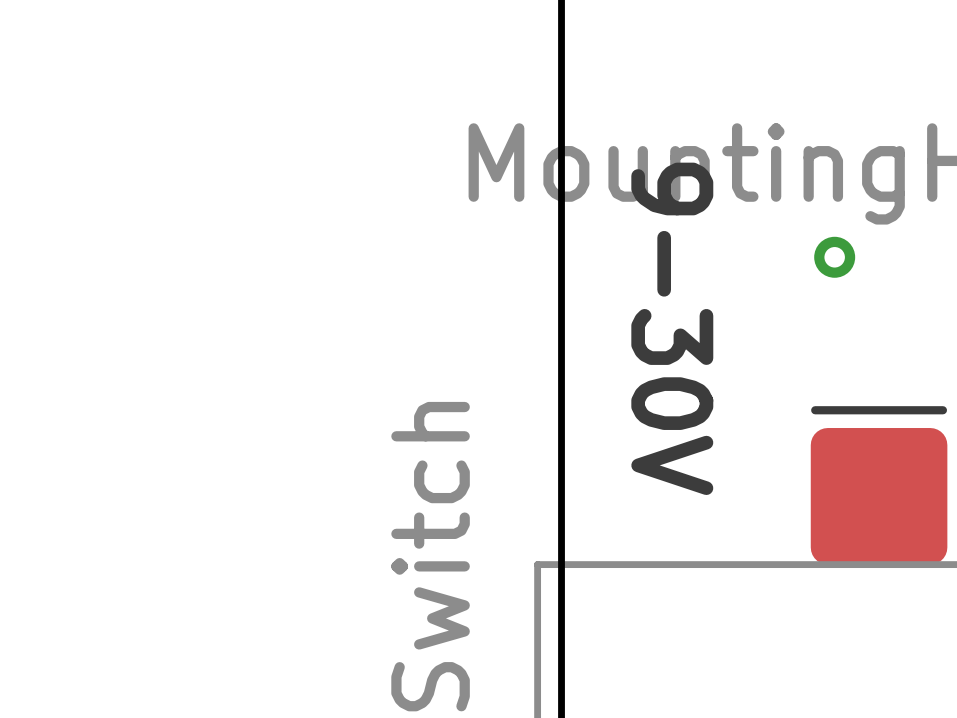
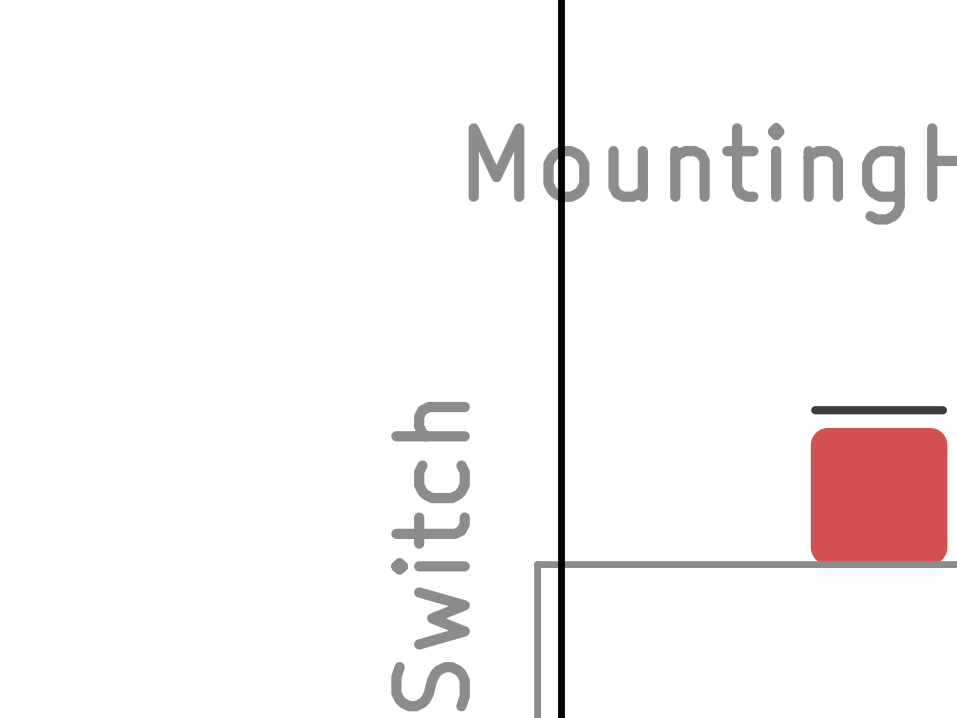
via: (834, 257) -> none
text: 9-30V (672, 328) -> none

